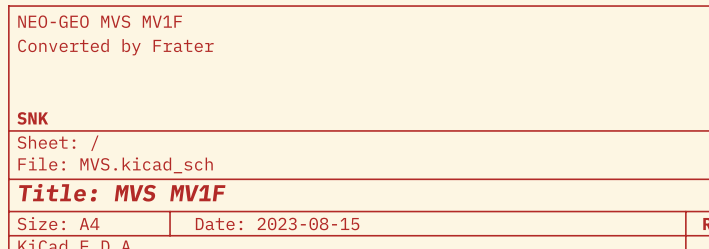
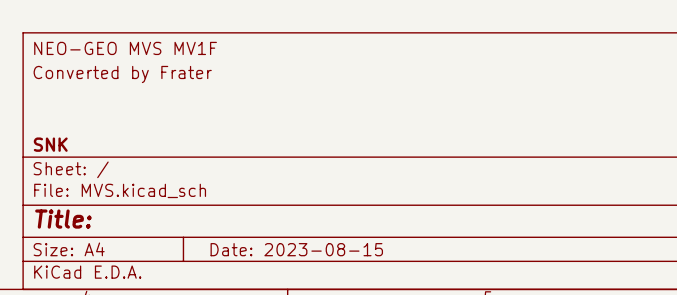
title block: Title: MVS MV1F (122, 192) -> Title: (63, 219)

